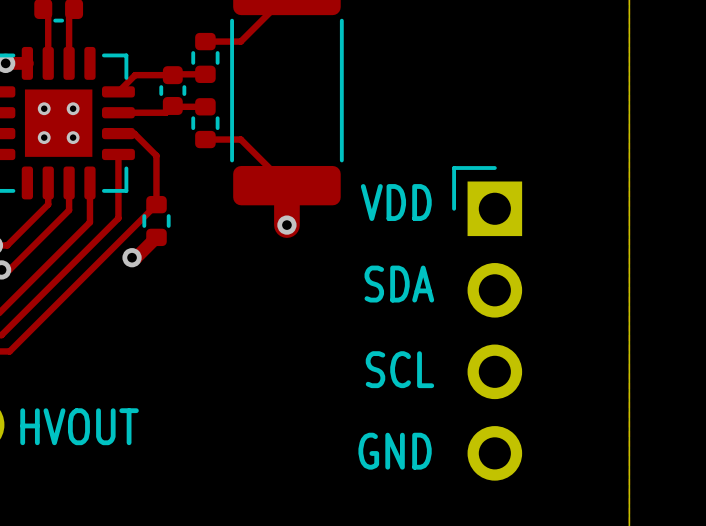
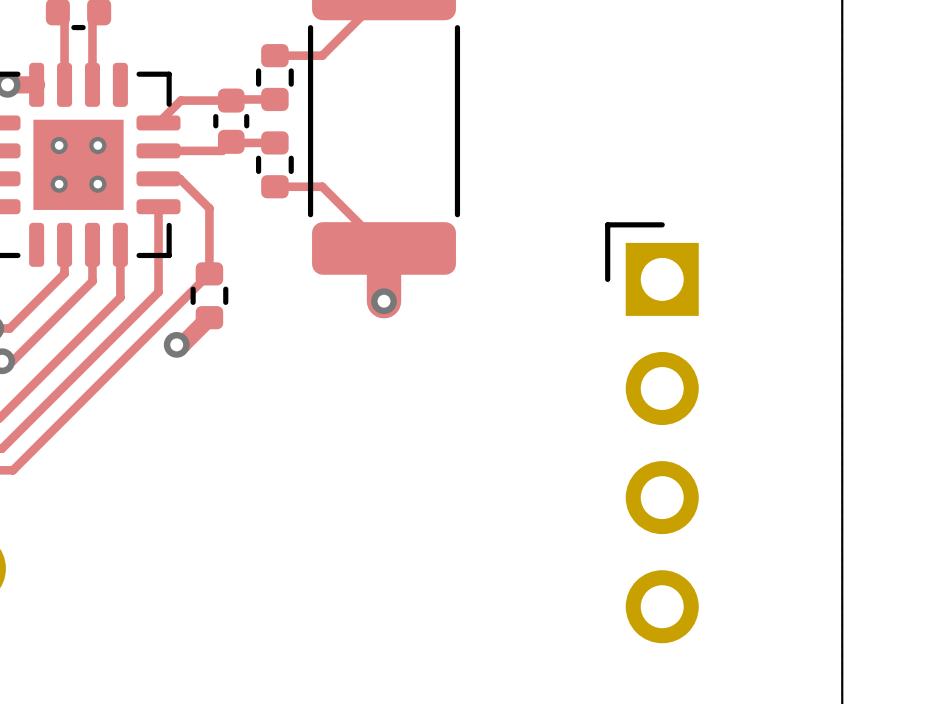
text: VDD (396, 202) -> none
text: SDA (399, 284) -> none
text: SCL (399, 369) -> none
text: HVOUT (79, 426) -> none
text: GND (395, 451) -> none

